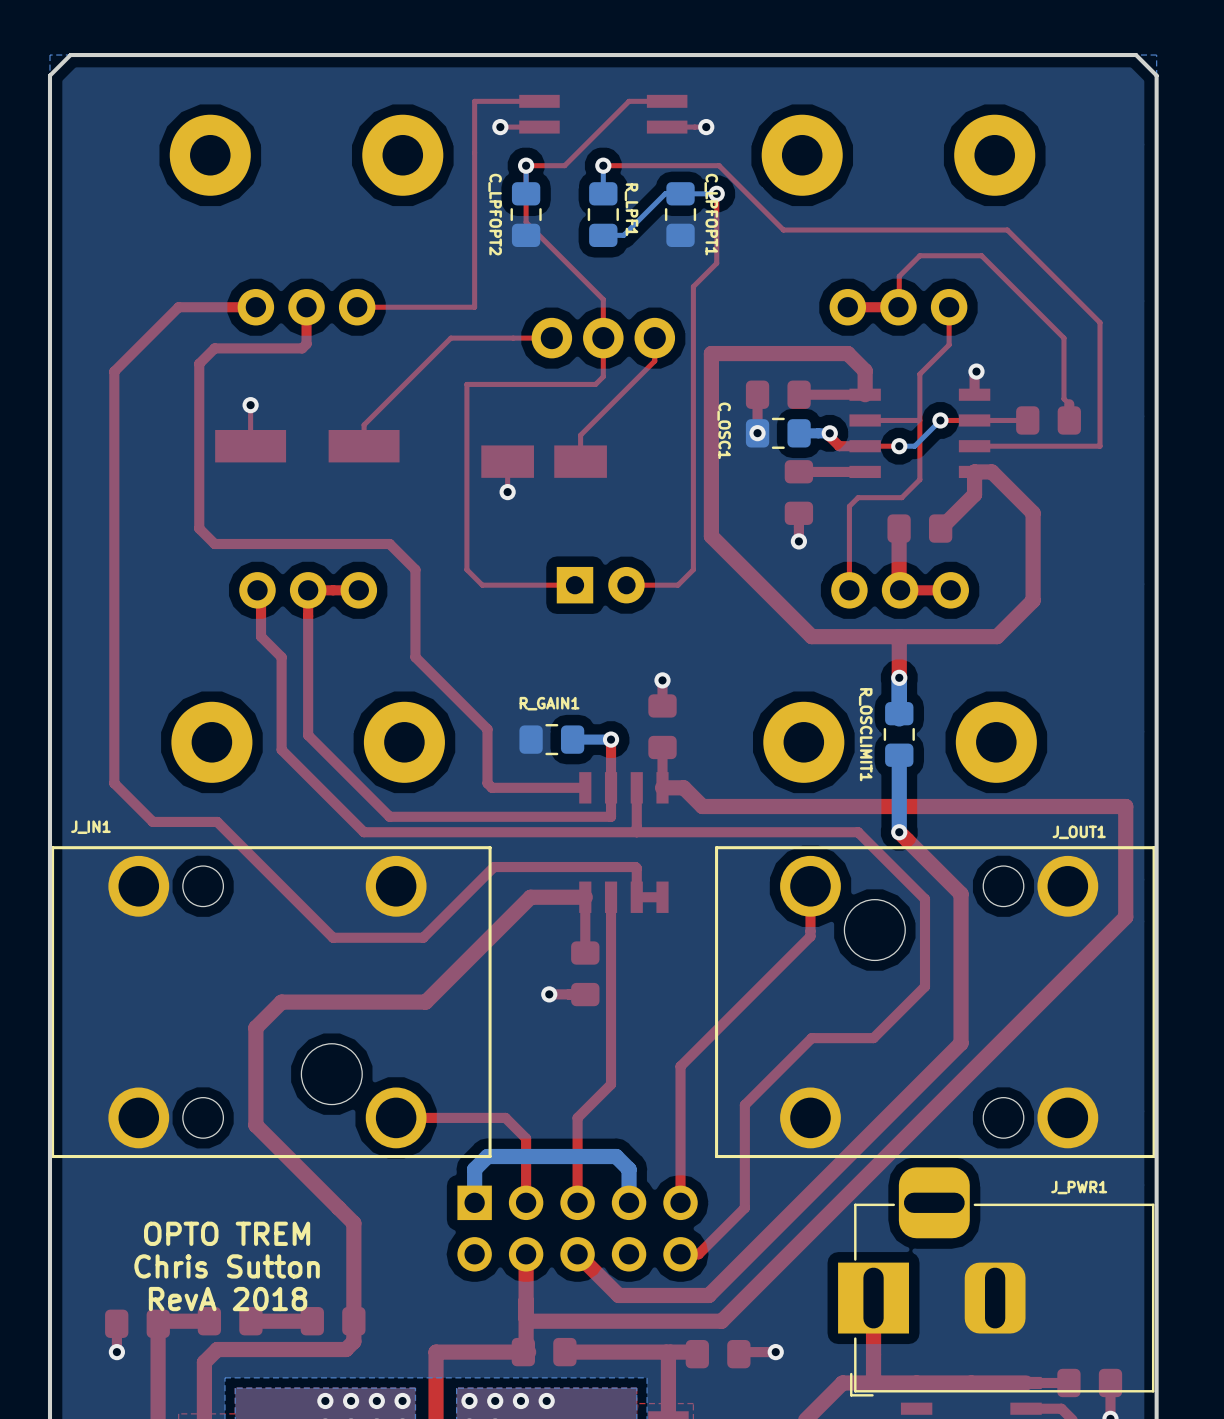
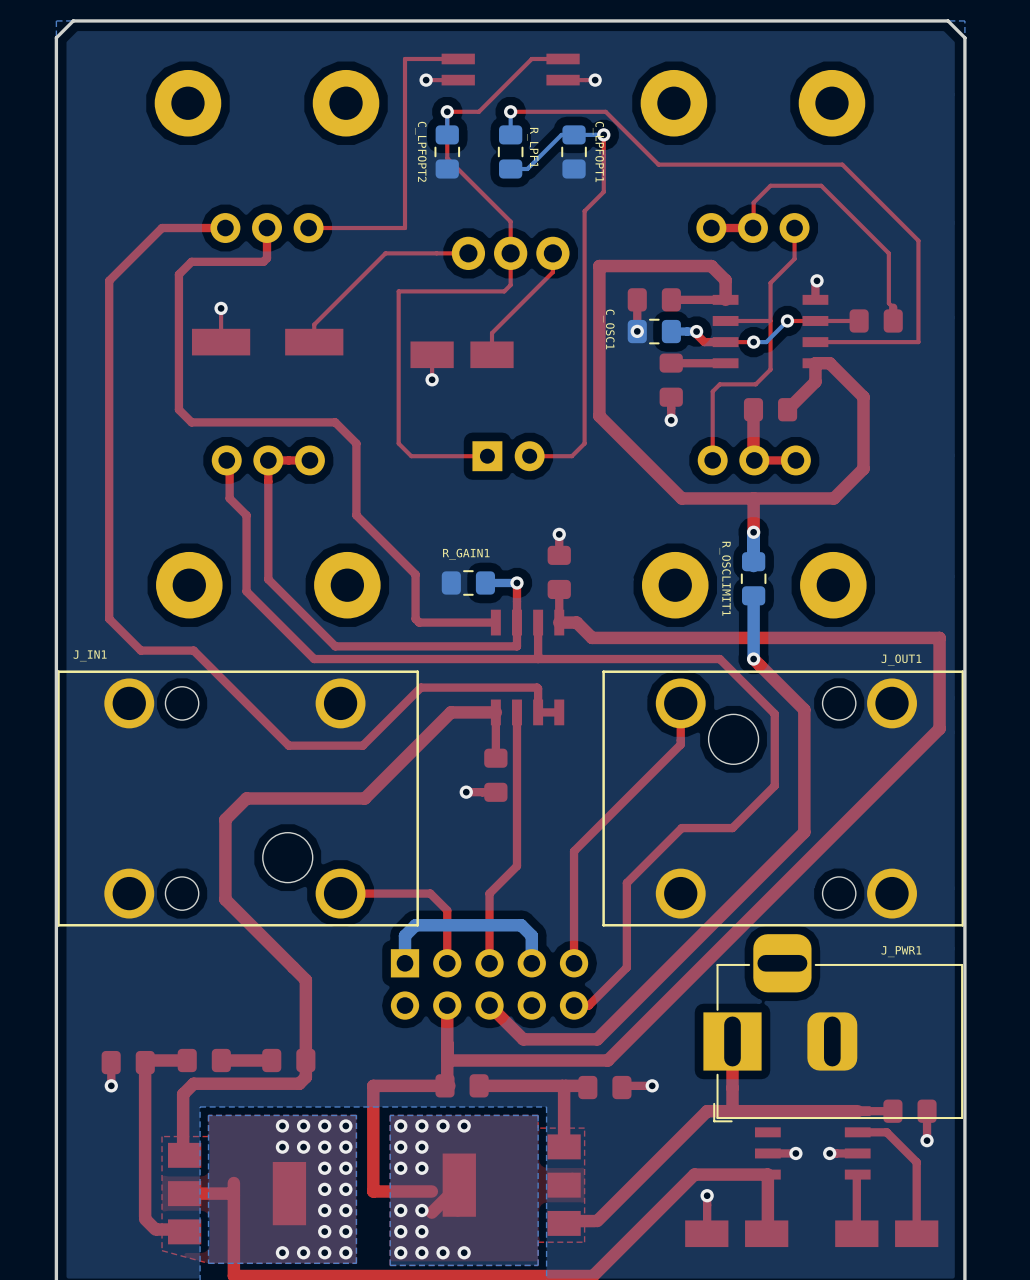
text: OPTO TREM (227, 1233) -> none
text: Chris Sutton (227, 1266) -> none
text: RevA 2018 (228, 1299) -> none

